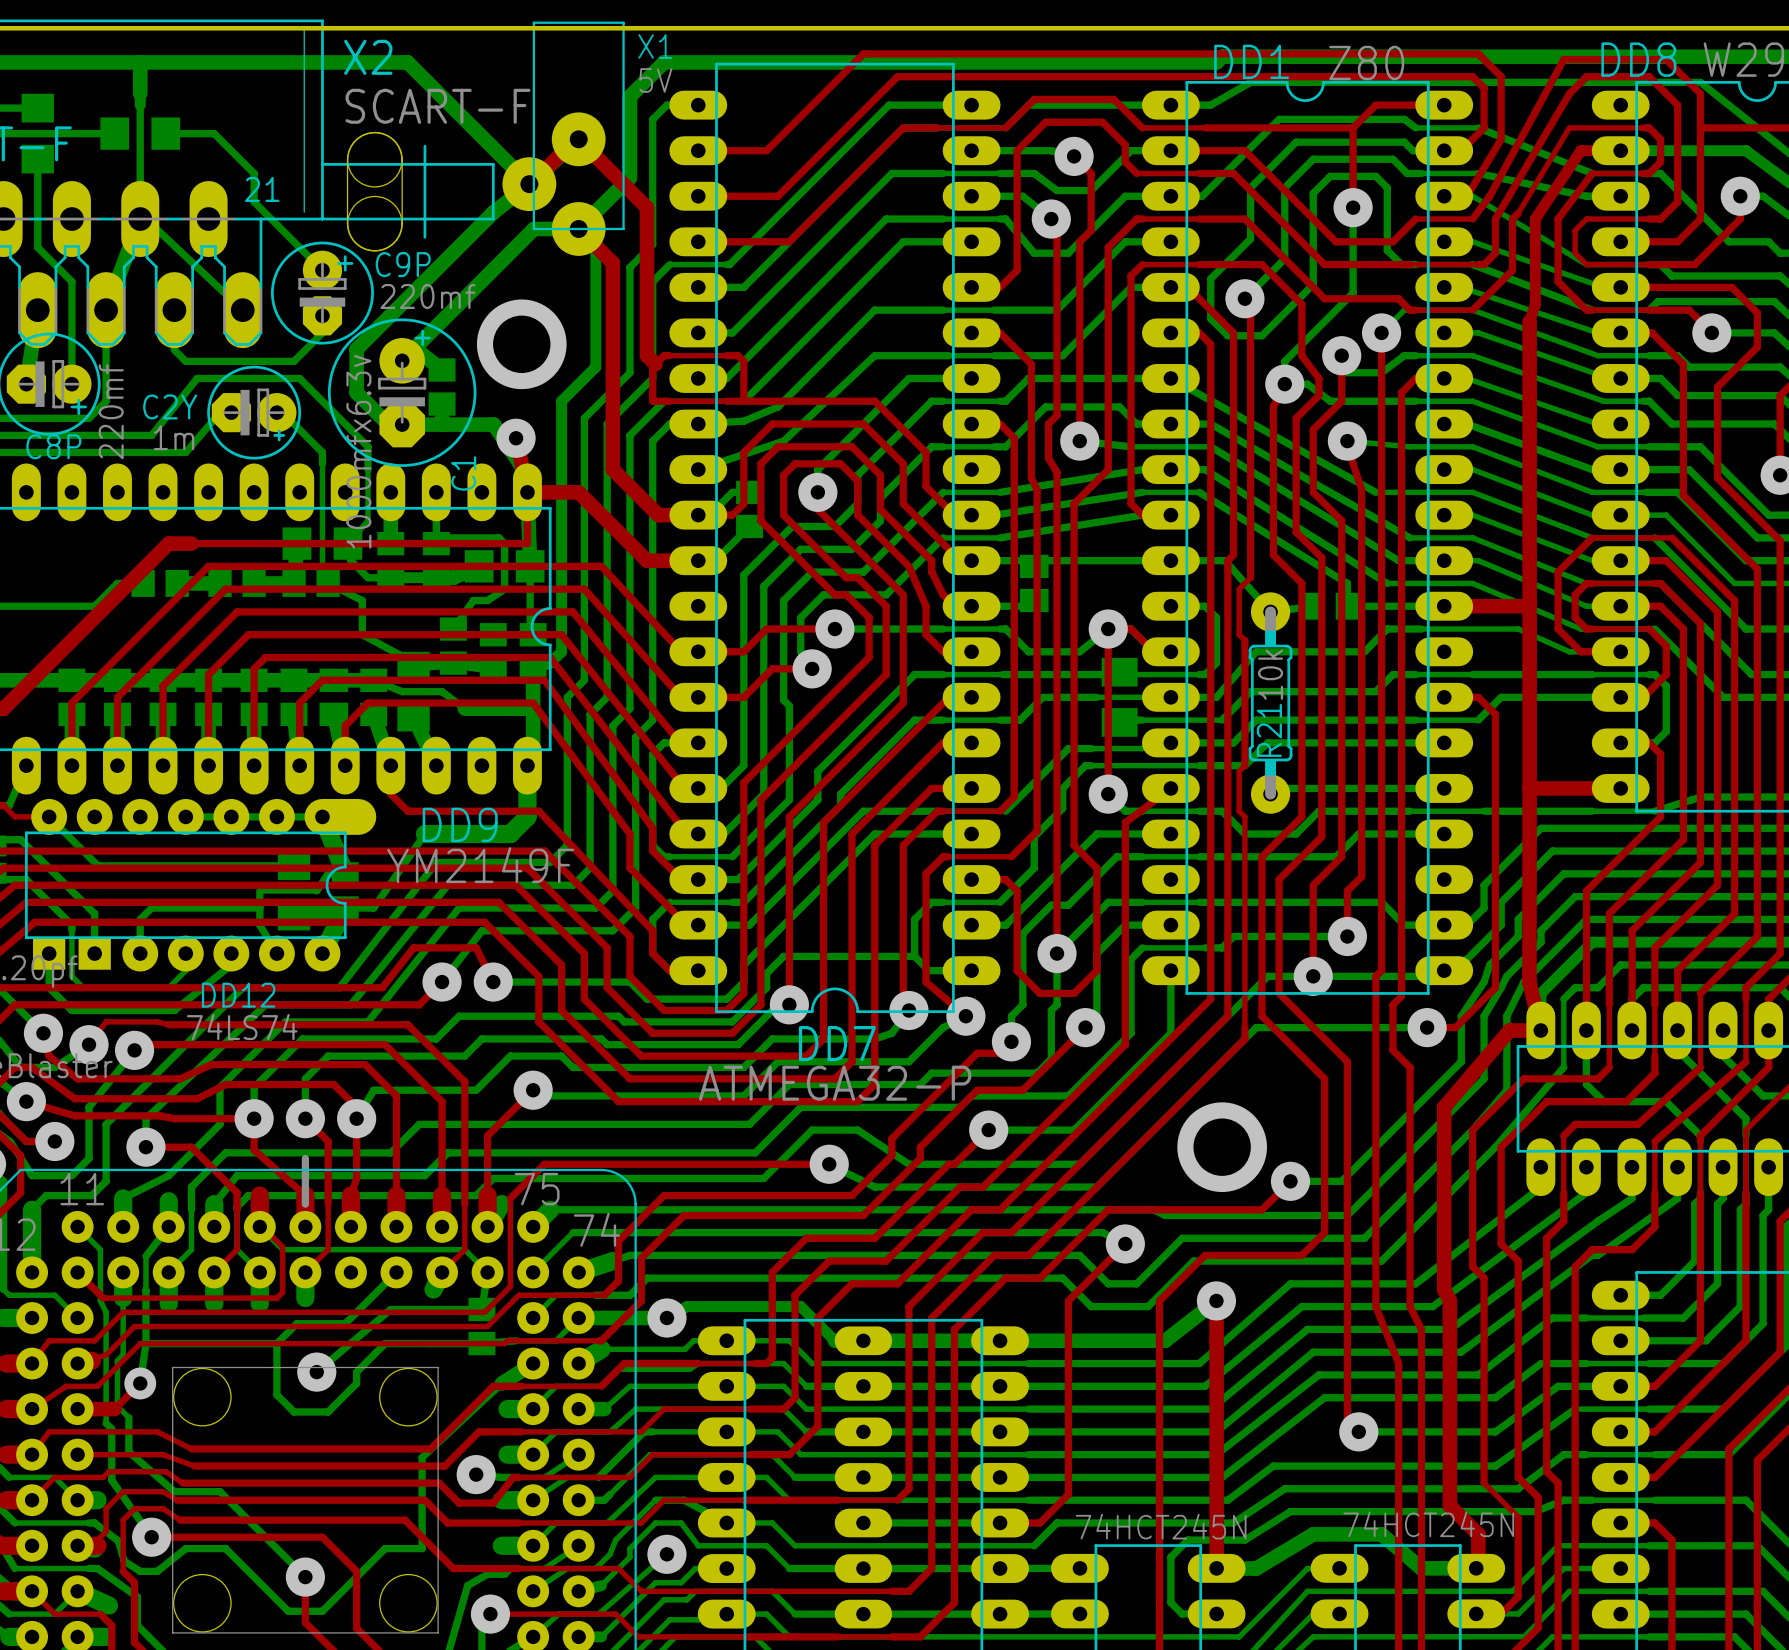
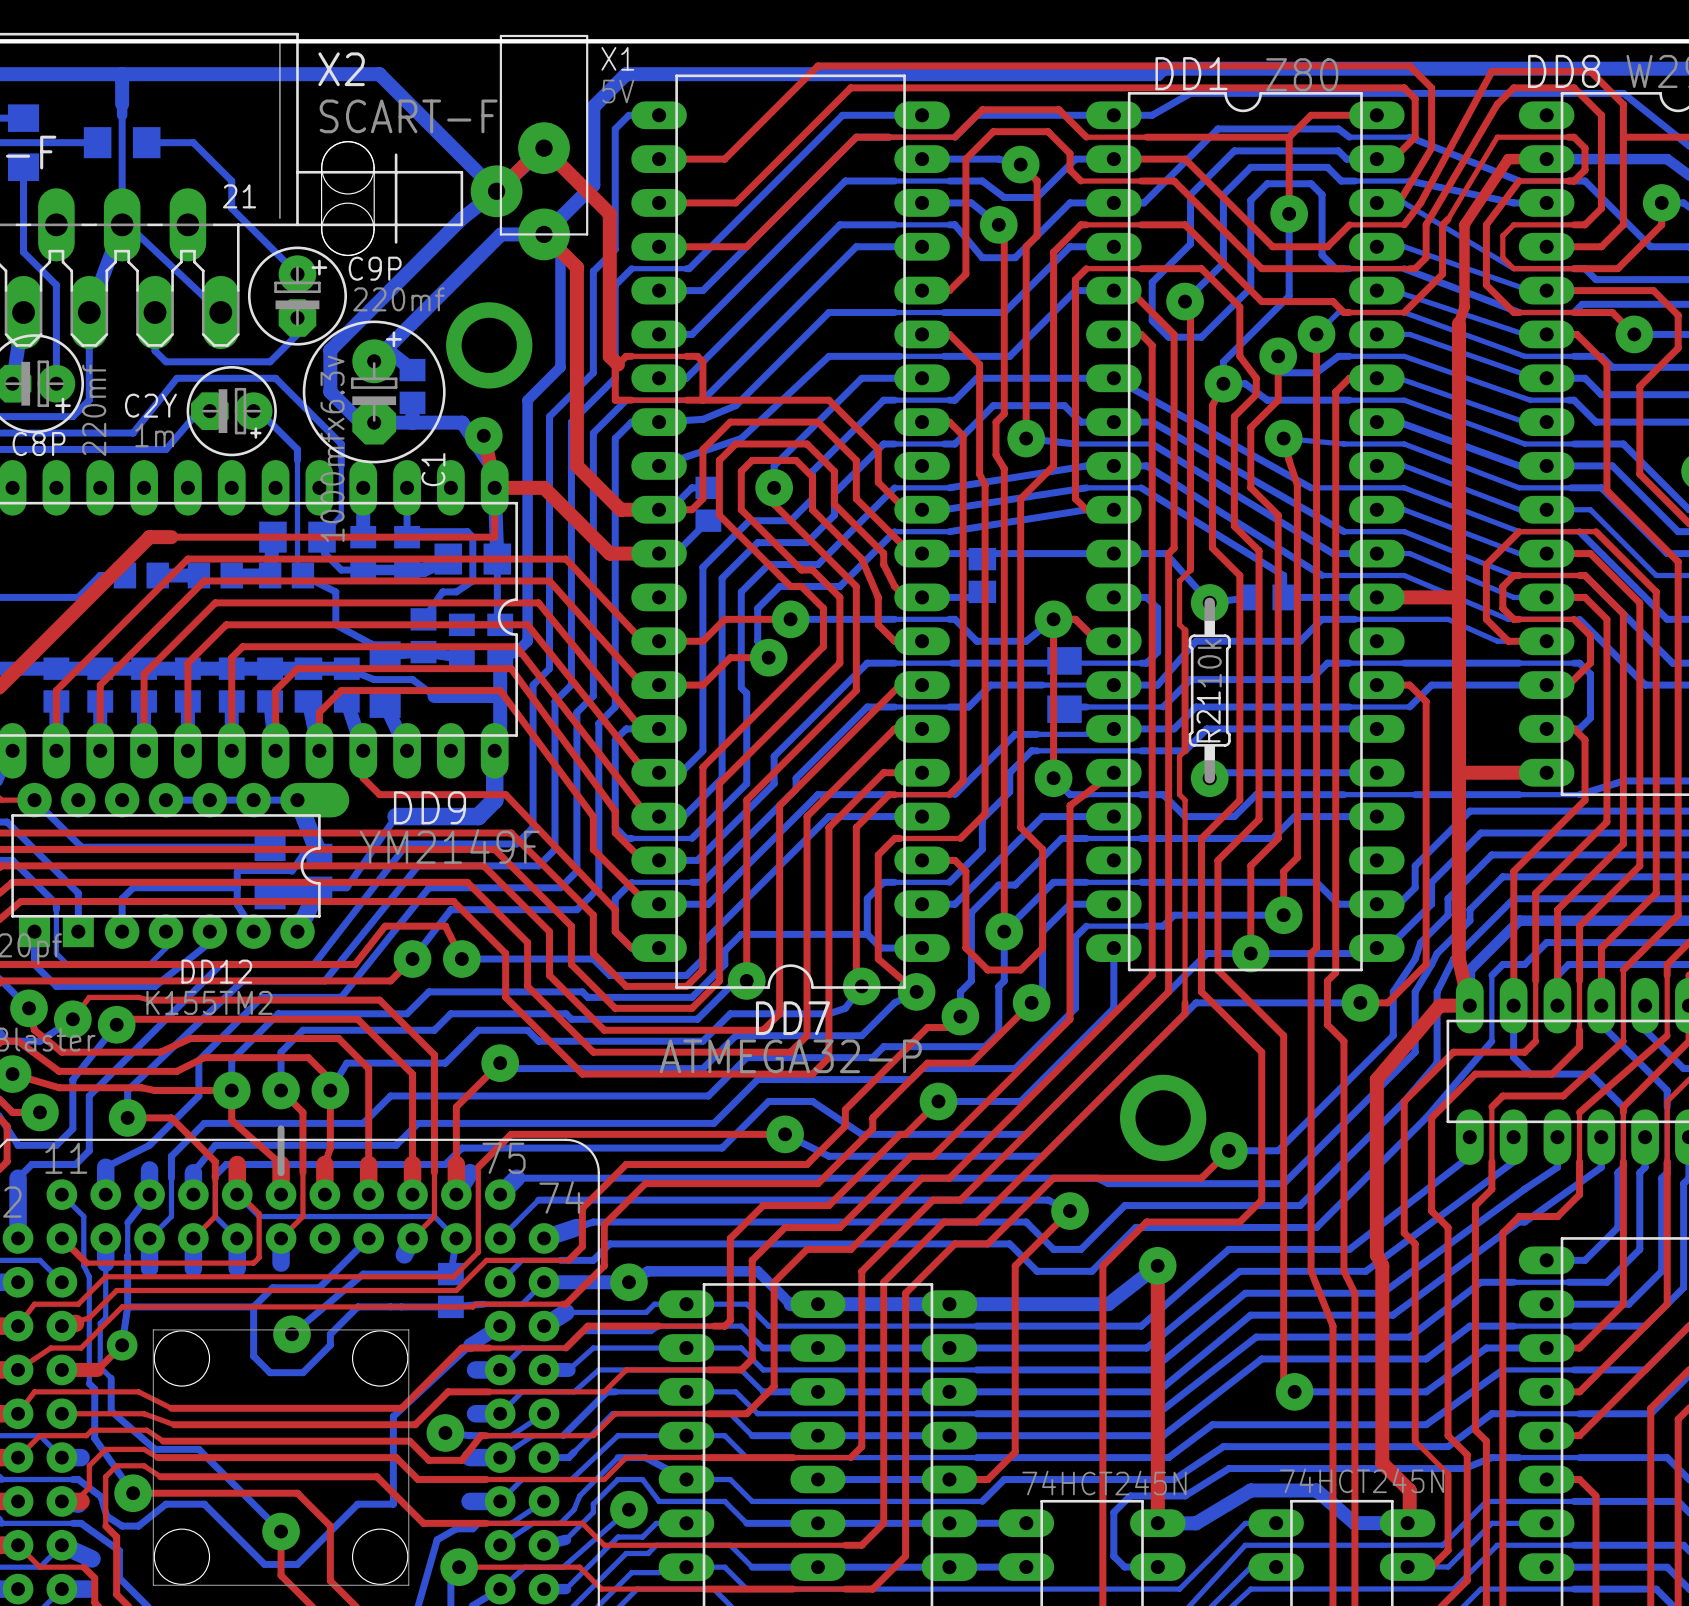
DD12 value: 74LS74 (242, 1027) -> К155ТМ2 (209, 1002)

